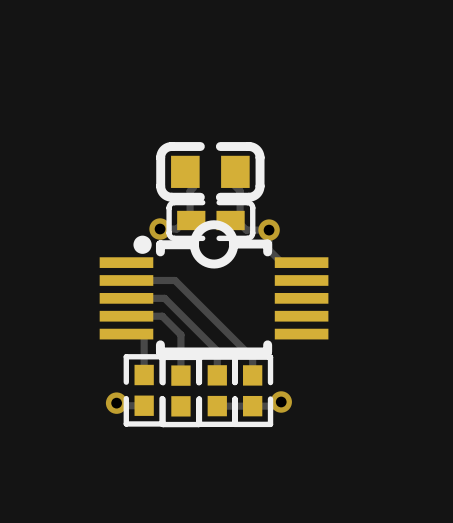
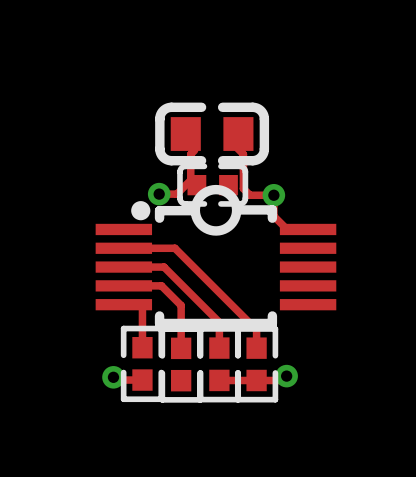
part footprint: [166, 199, 256, 242] -> [177, 163, 249, 207]

